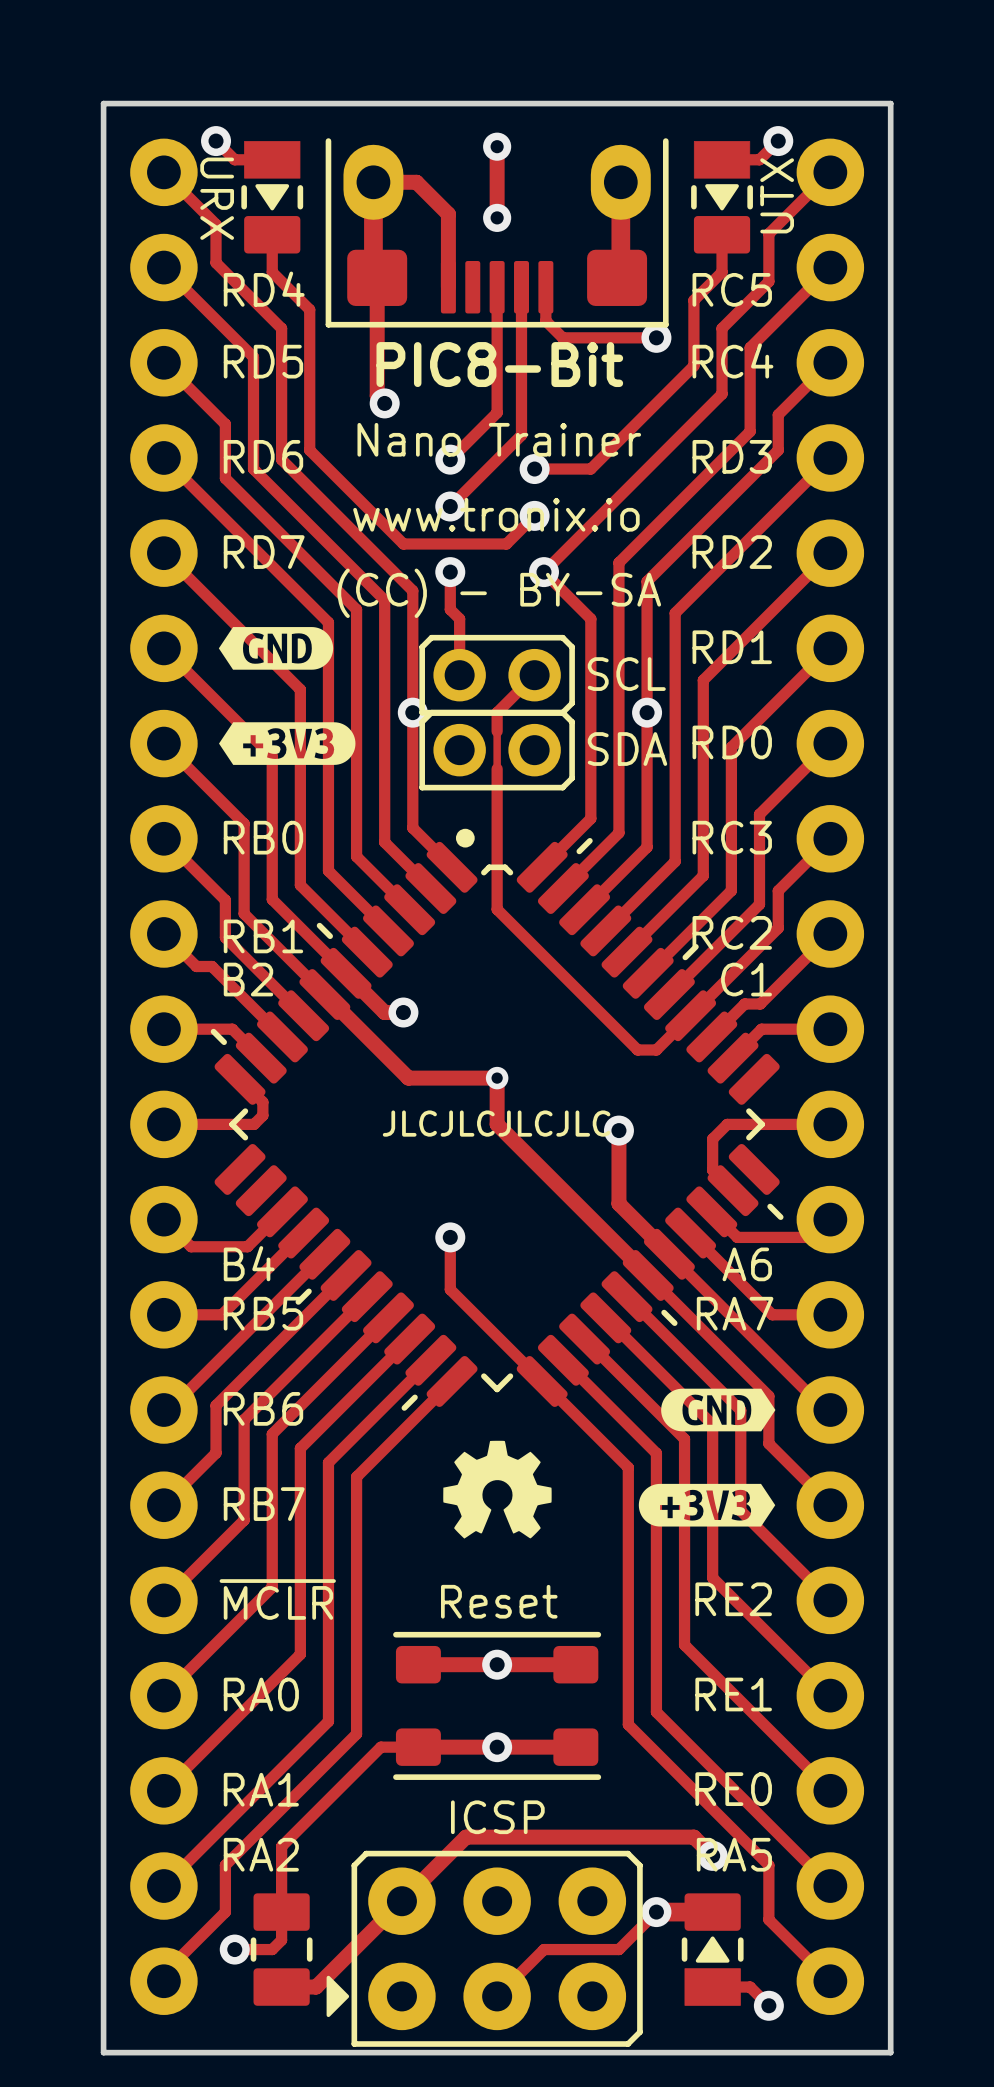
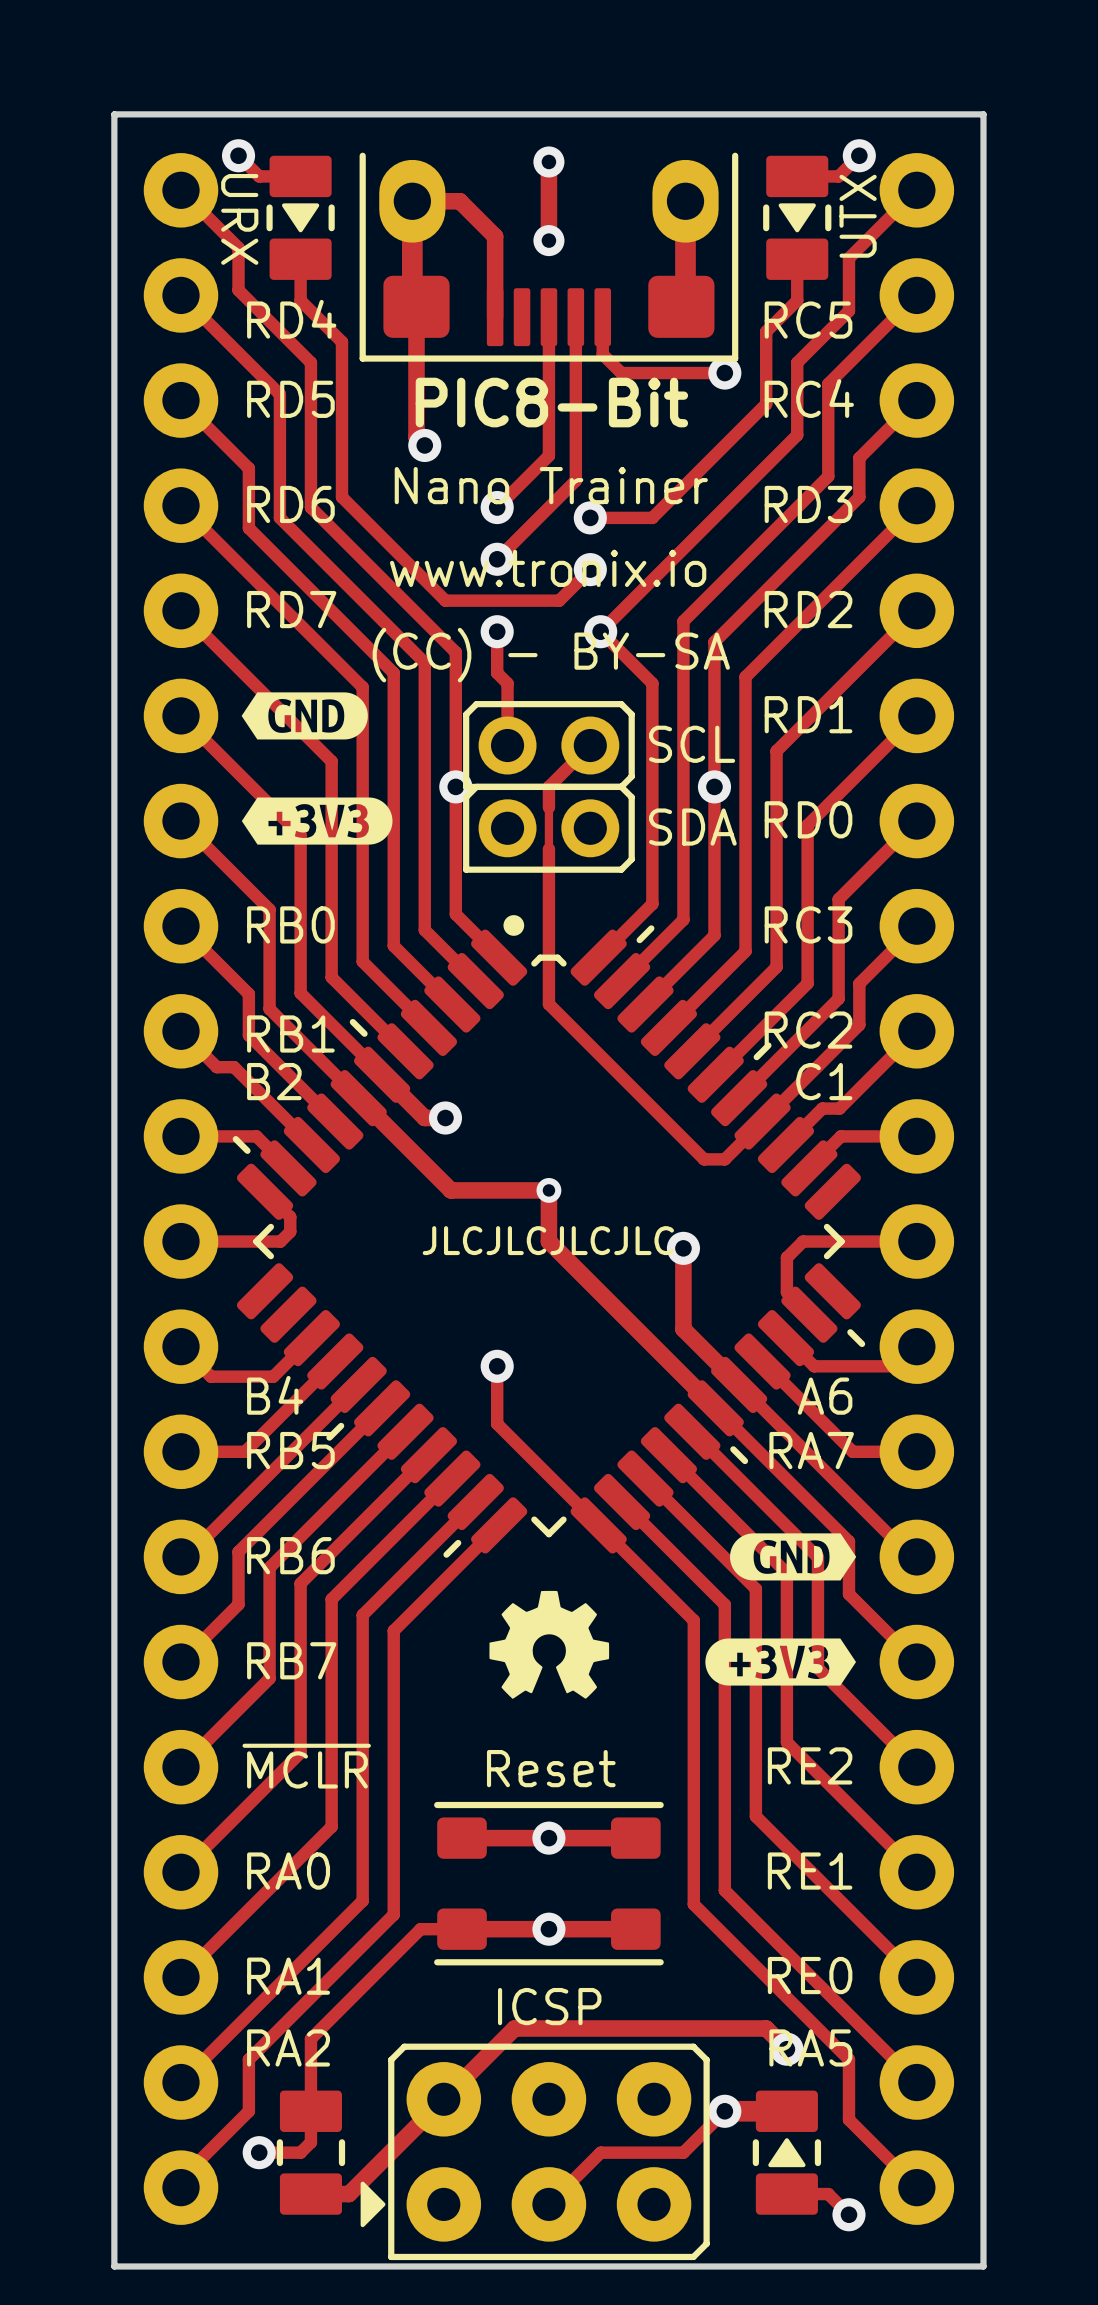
part footprint: [241, 141, 304, 254] -> [266, 155, 335, 280]
part footprint: [691, 141, 753, 254] -> [763, 155, 832, 280]
part footprint: [681, 1893, 744, 2006] -> [752, 2090, 822, 2215]

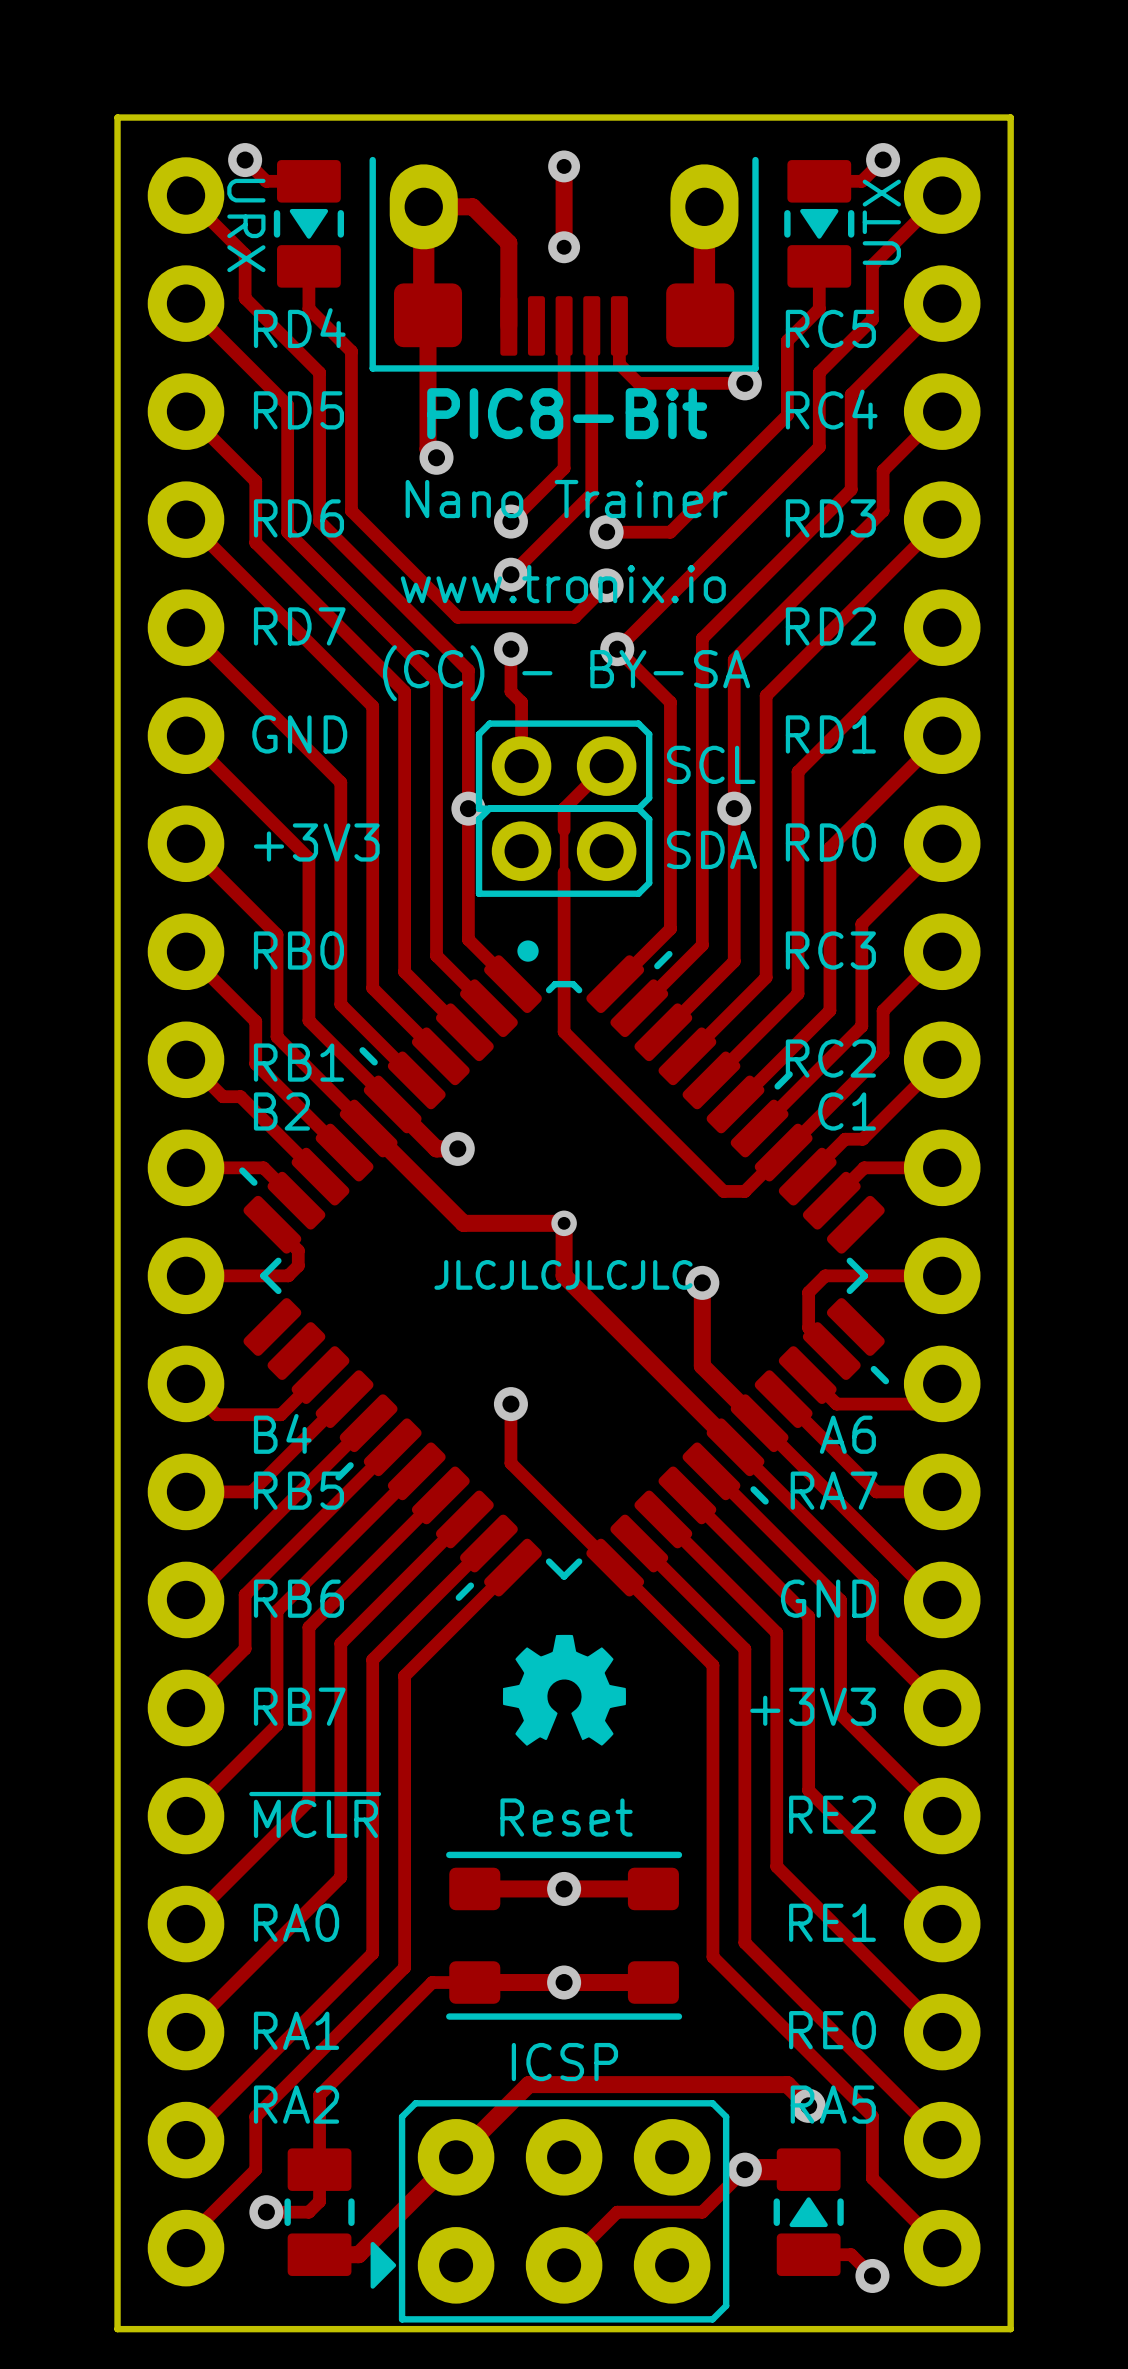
drawing: [241, 692, 368, 740] -> none
text: none -> GND (299, 734)
drawing: [241, 797, 393, 845] -> none
text: none -> +3V3 (316, 842)
drawing: [730, 1533, 857, 1581] -> none
text: none -> GND (828, 1598)
drawing: [705, 1638, 857, 1686] -> none
text: none -> +3V3 (813, 1706)

